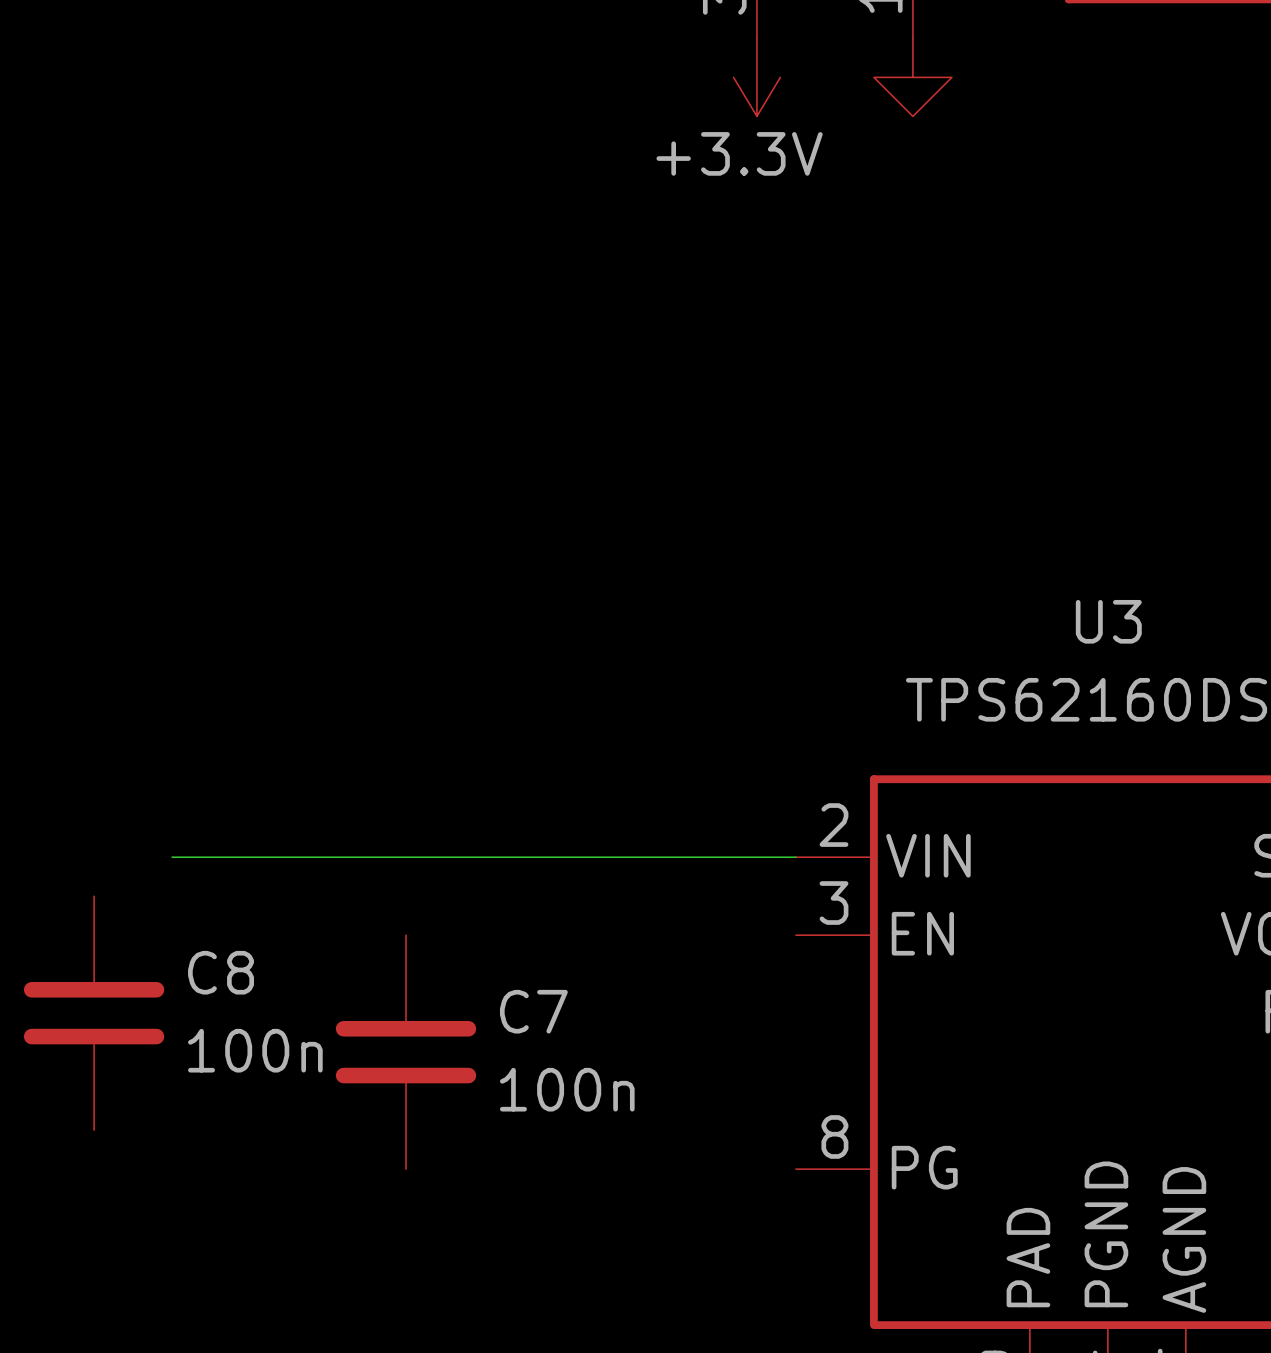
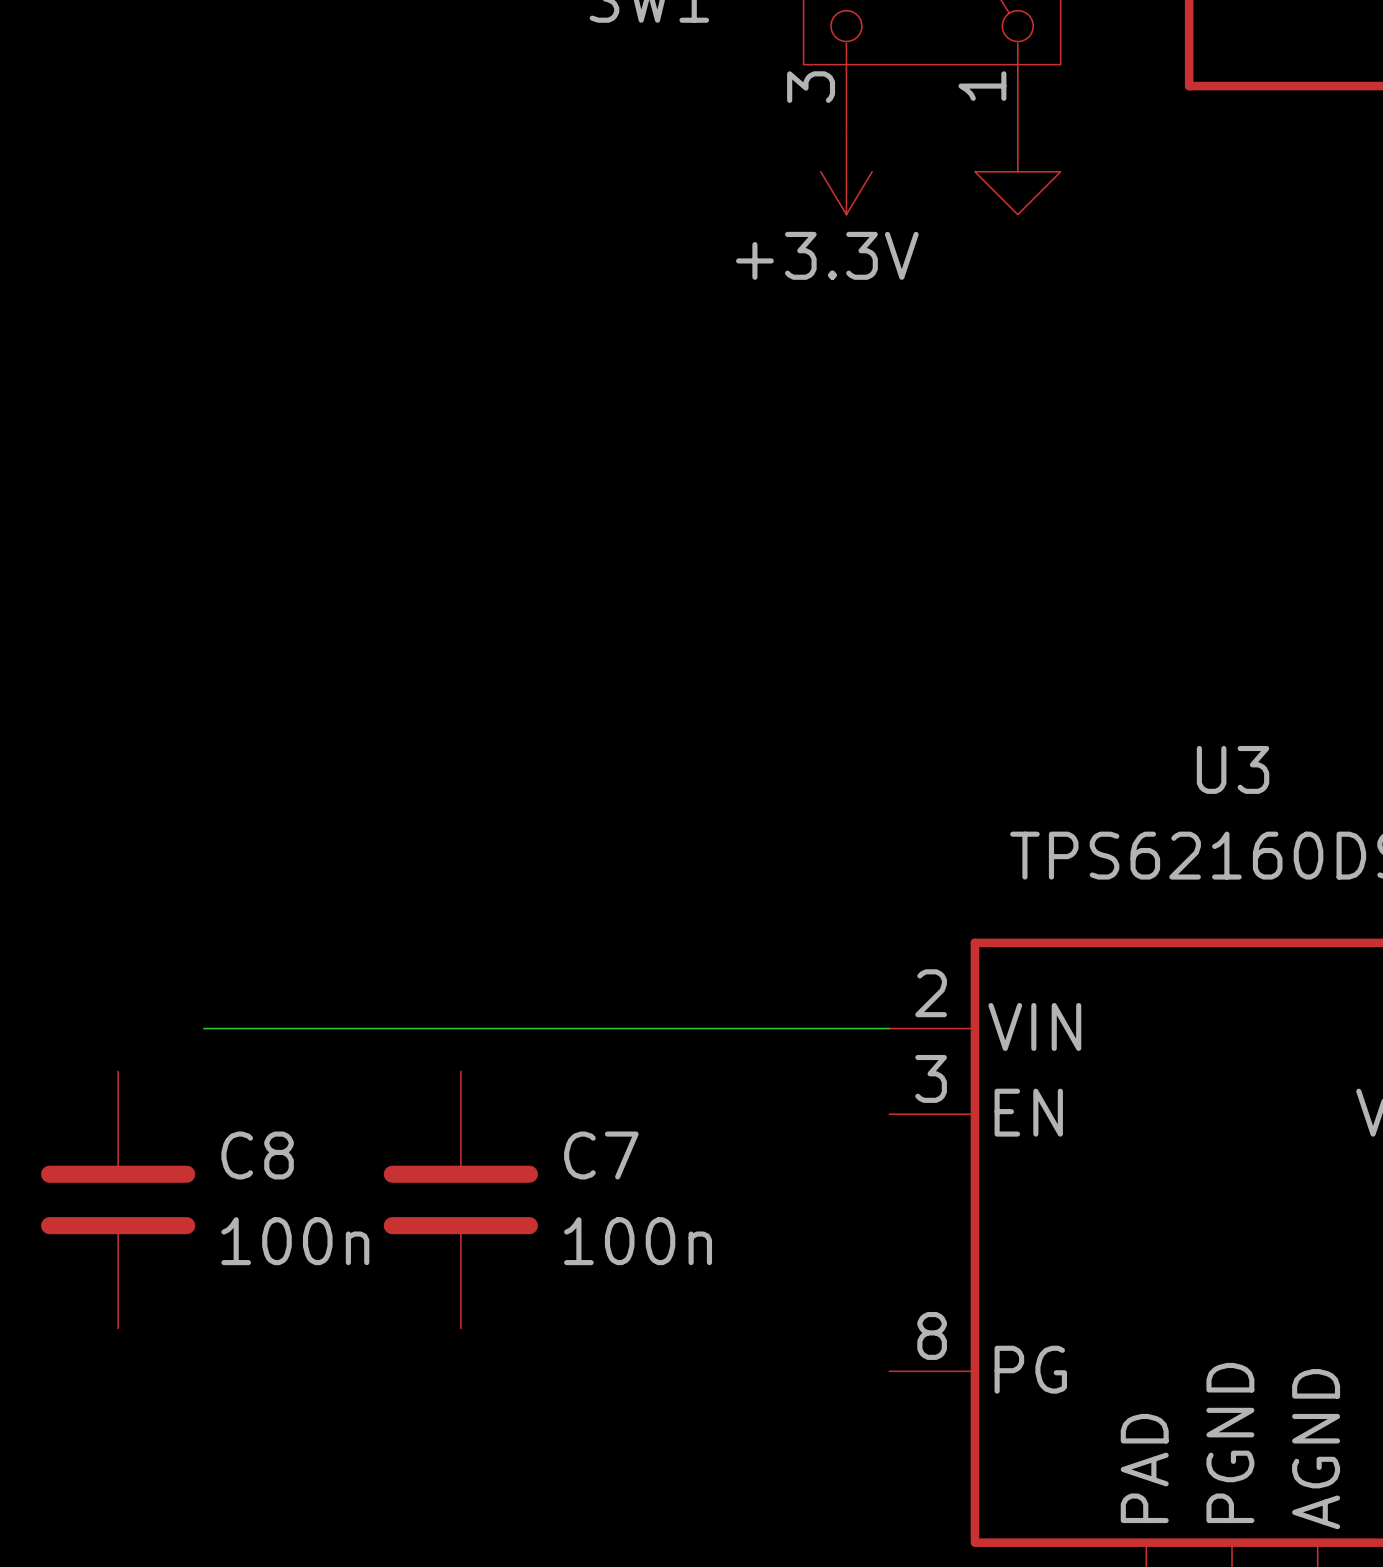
C7 position: (406, 1052) -> (460, 1199)

